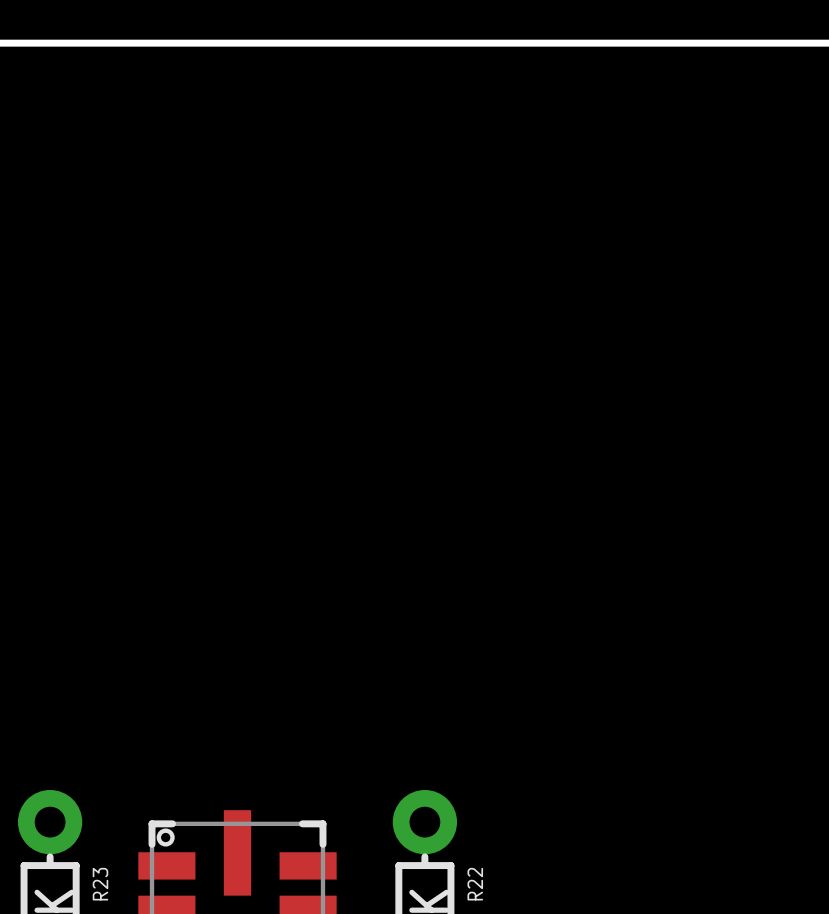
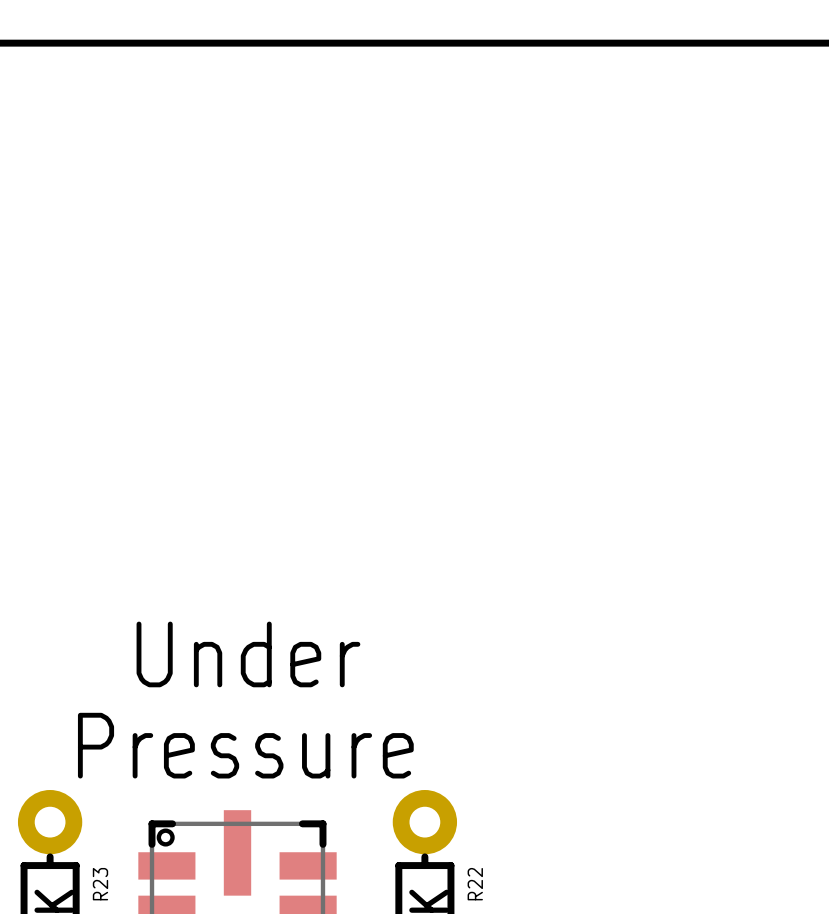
text: none -> Under (248, 654)
text: none -> Pressure (245, 745)

